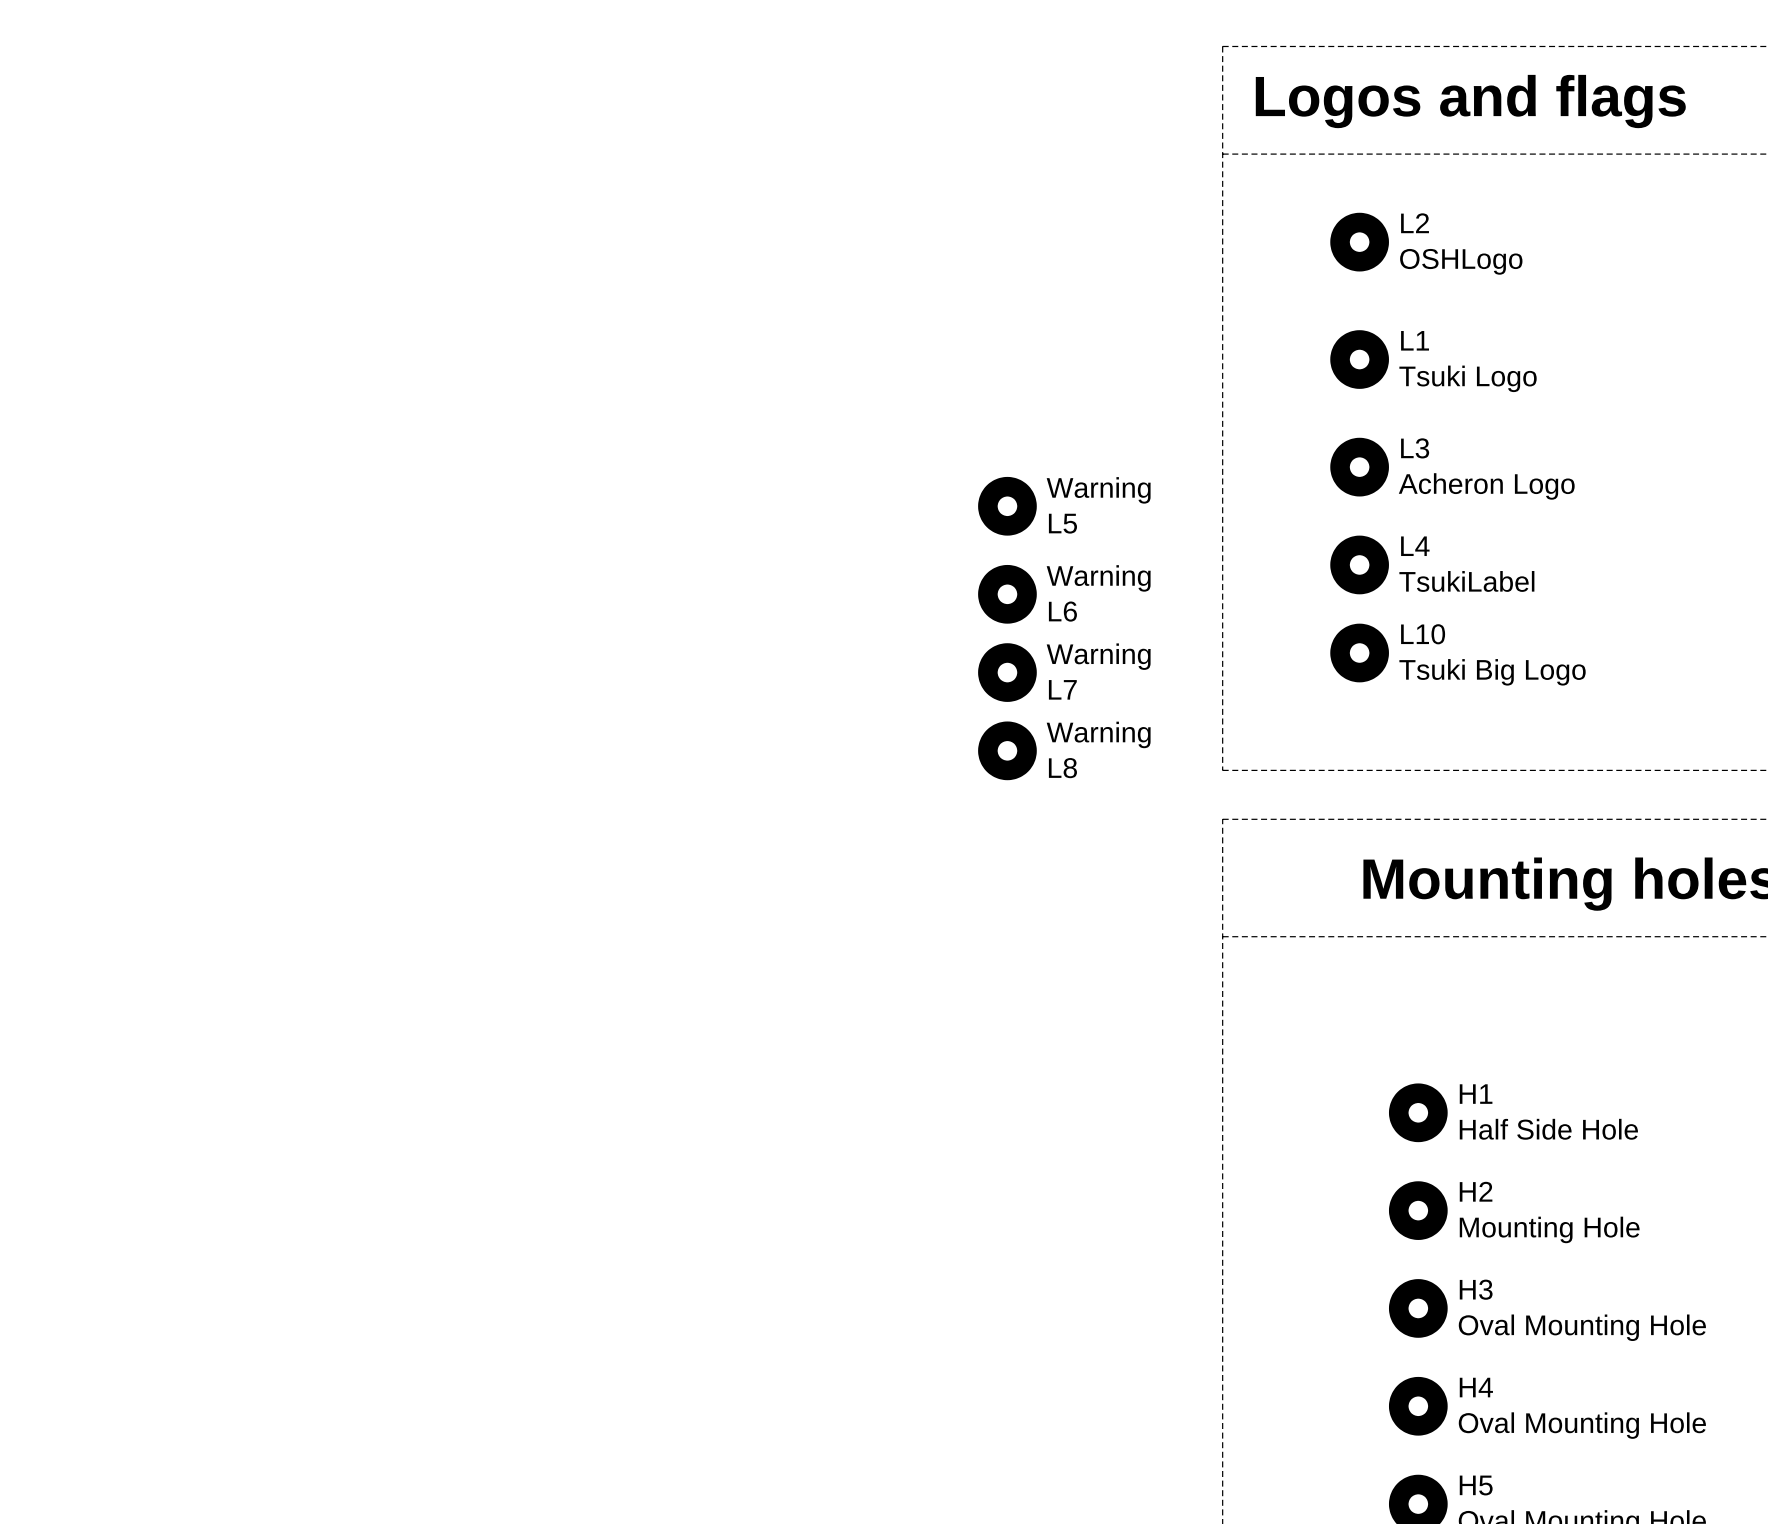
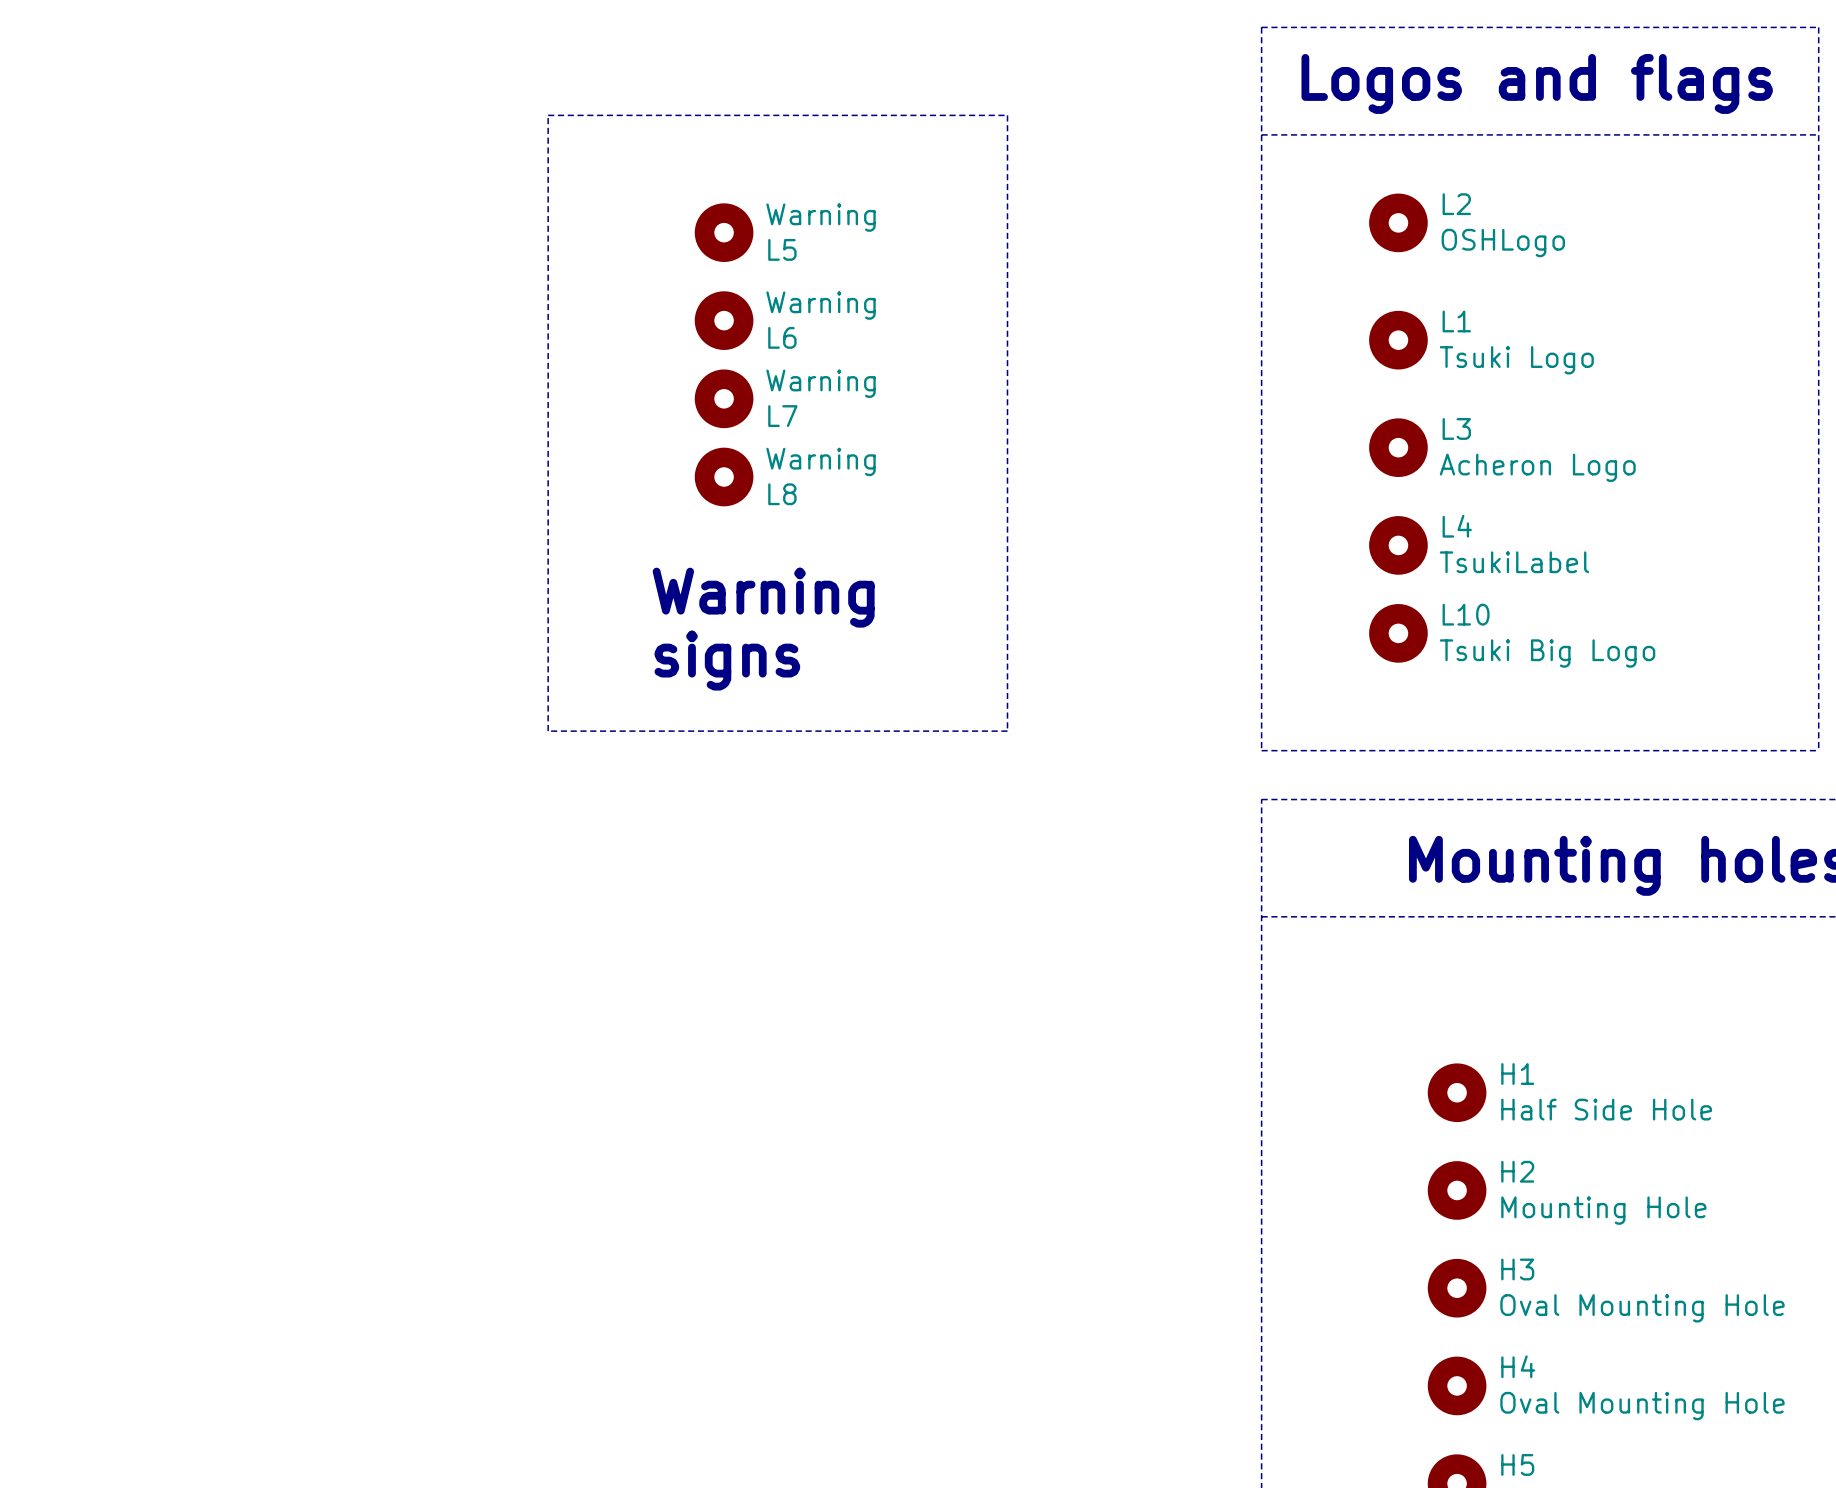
line: none -> (548, 115) (1007, 115) (1007, 731) (548, 731) (548, 115)
L5 position: (1007, 506) -> (724, 232)
L6 position: (1007, 594) -> (724, 320)
text: none -> Warning (763, 597)
L7 position: (1007, 672) -> (724, 398)
text: none -> signs (727, 660)
L8 position: (1007, 750) -> (724, 477)

